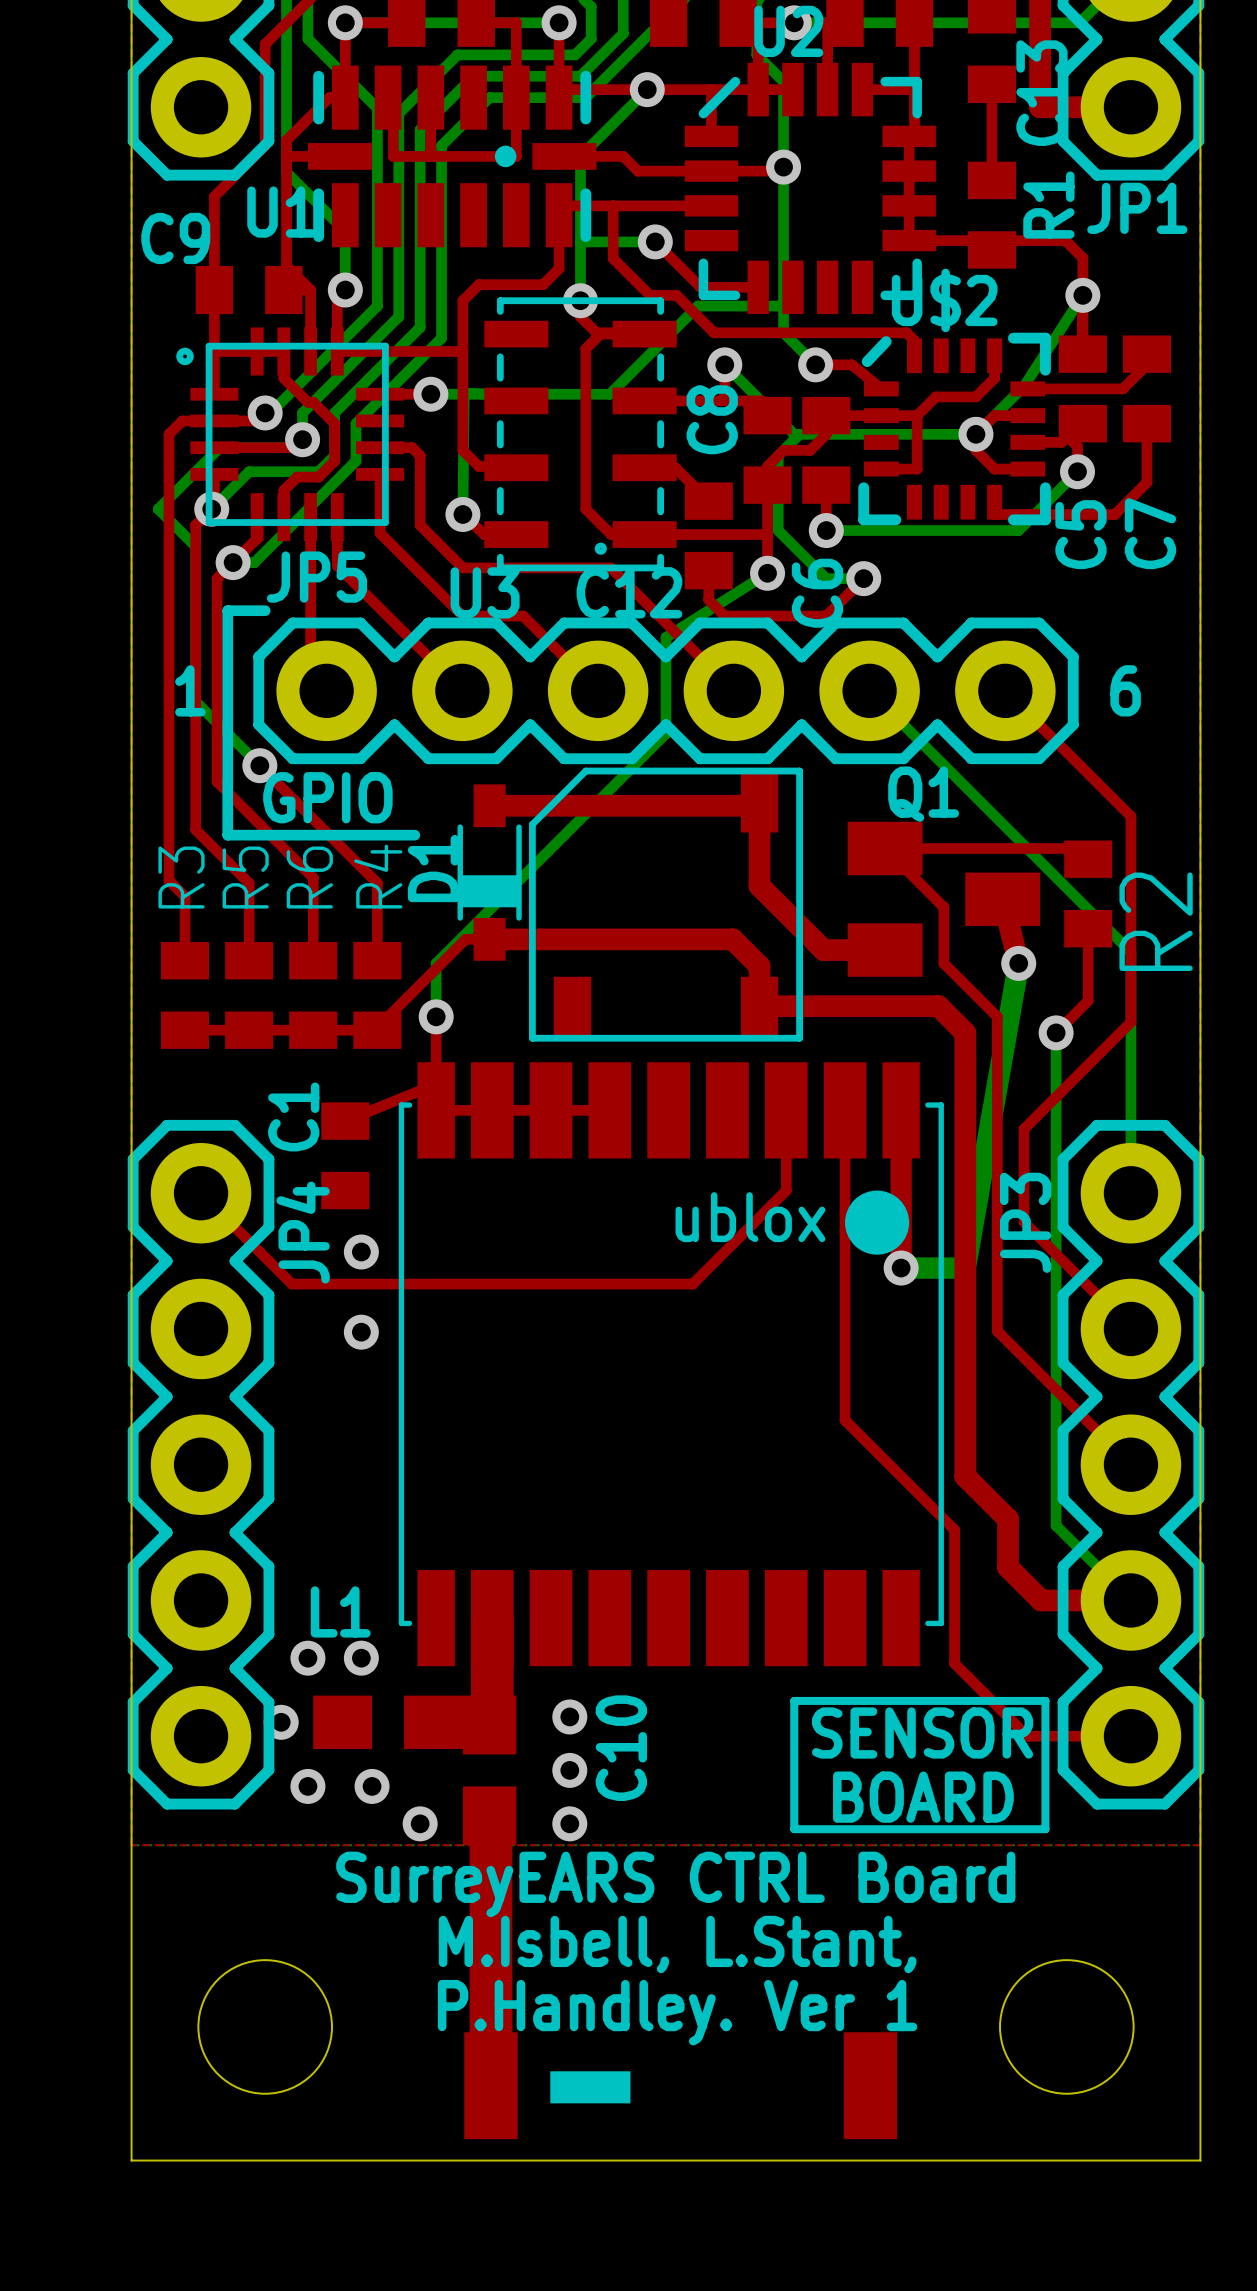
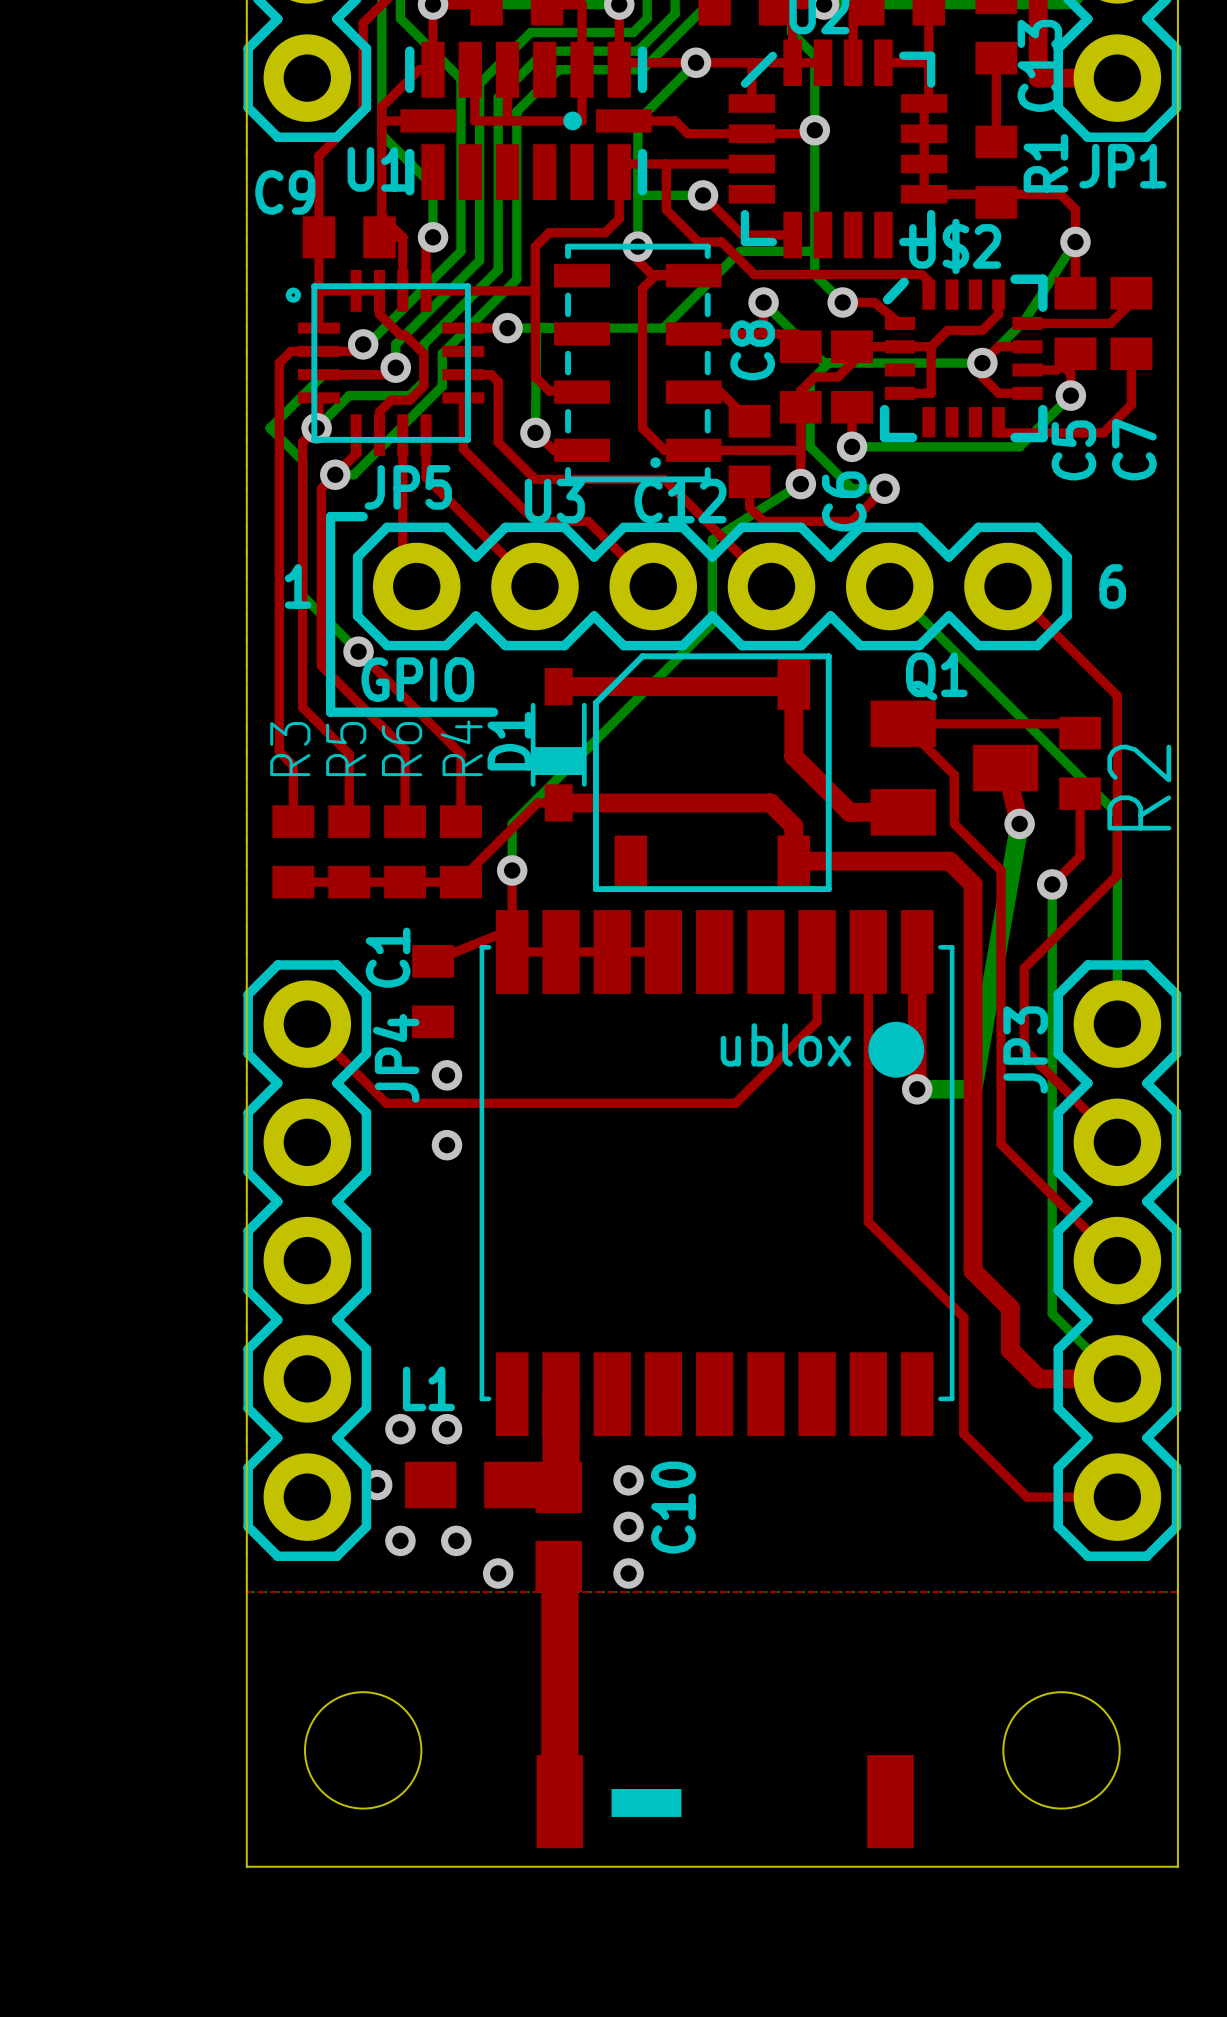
line: (794, 1700) (1045, 1700) (1045, 1829) (794, 1829) (794, 1700) -> none
text: SENSOR (922, 1733) -> none
text: BOARD (923, 1797) -> none
text: SurreyEARS CTRL Board (675, 1884) -> none
text: M.Isbell, L.Stant, (677, 1944) -> none
text: P.Handley. Ver 1 (677, 2012) -> none

